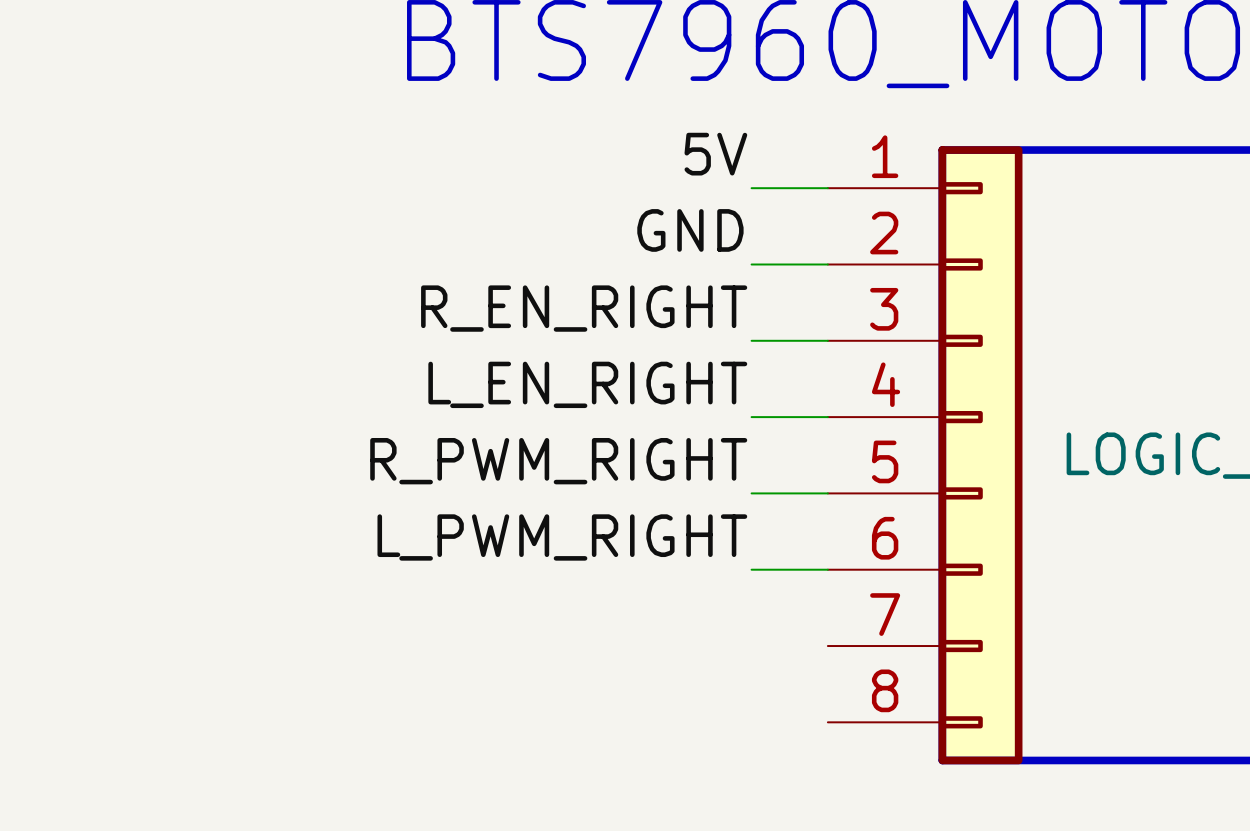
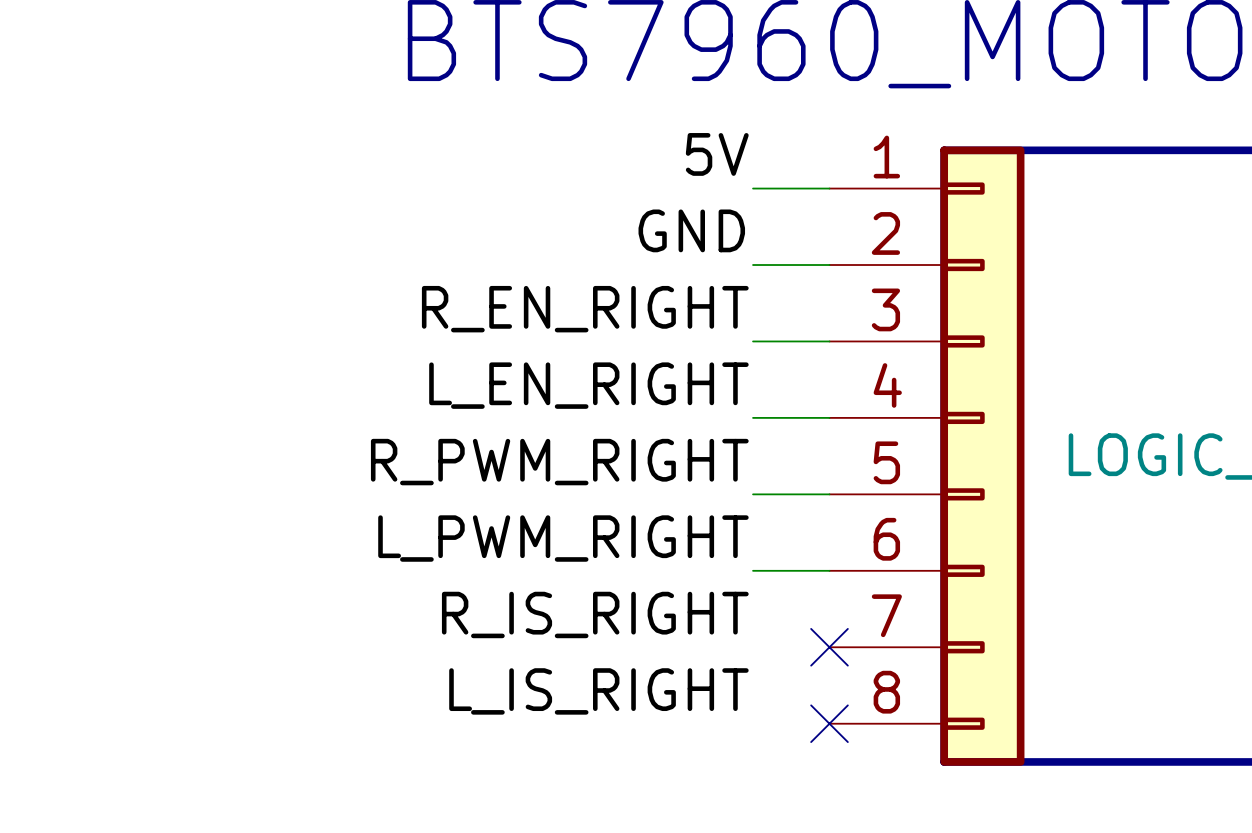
label: none -> R_IS_RIGHT (595, 614)
no-connect mark: none -> (829, 647)
label: none -> L_IS_RIGHT (598, 691)
no-connect mark: none -> (829, 723)

